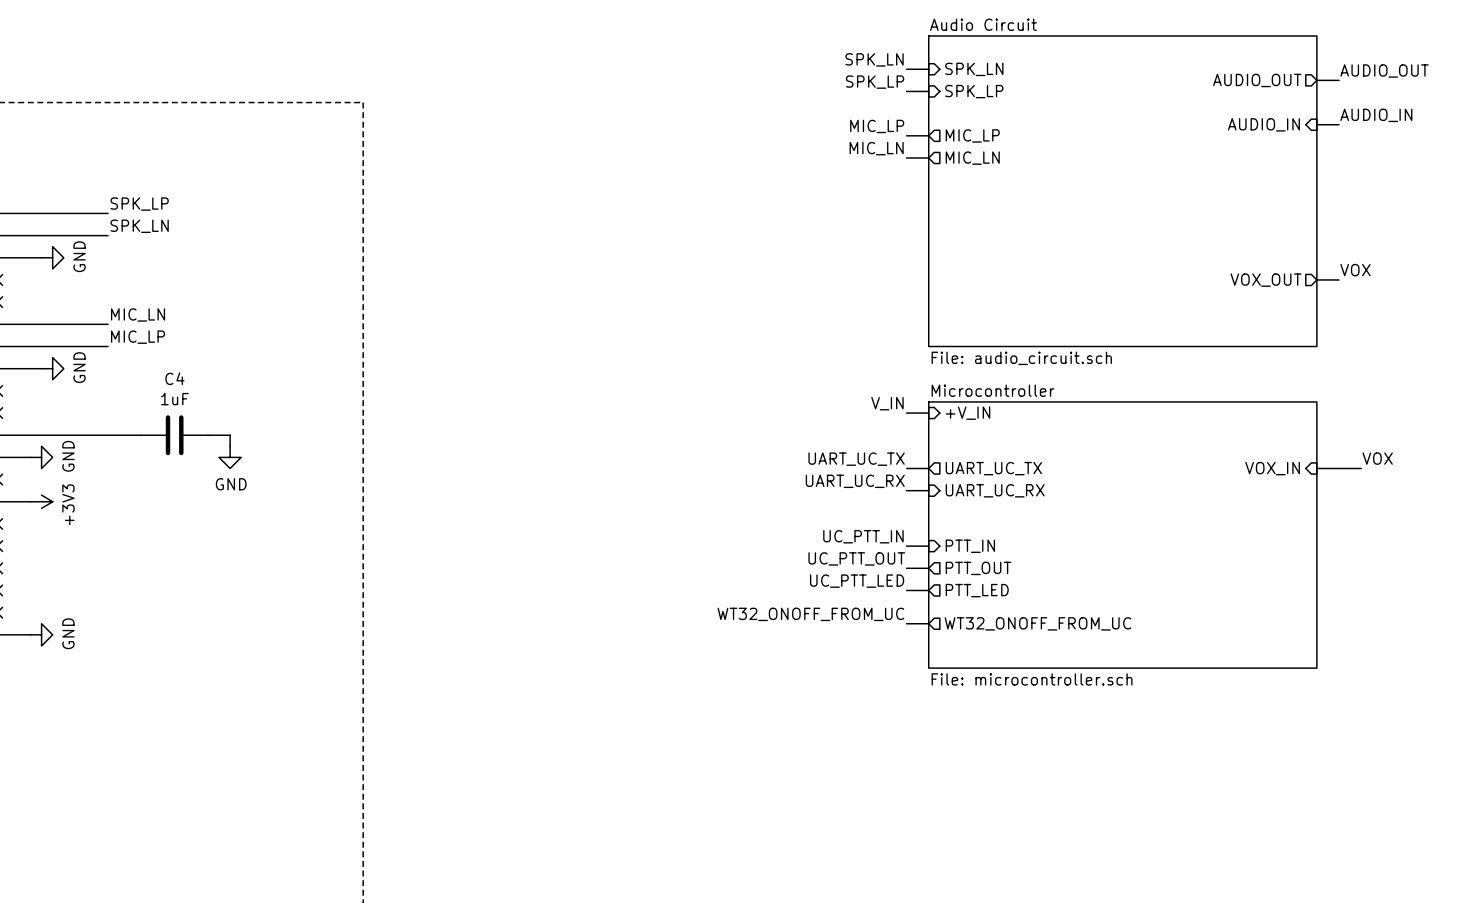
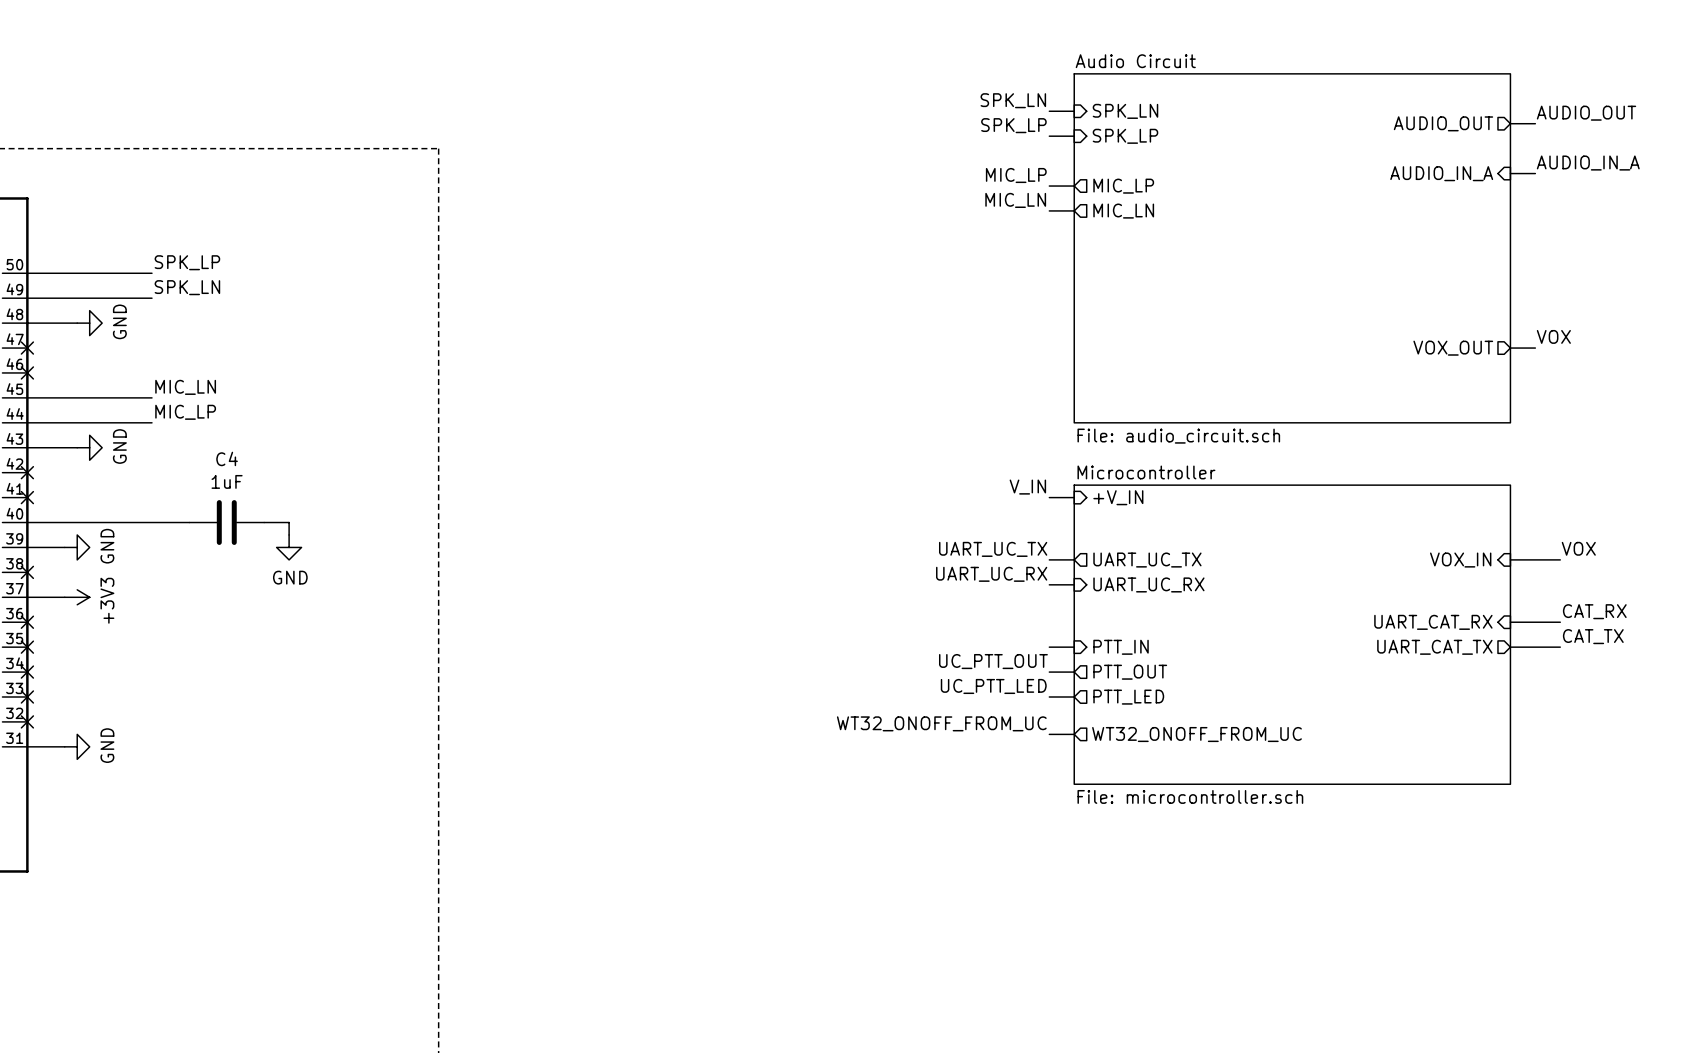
label: AUDIO_IN (1376, 115) -> AUDIO_IN_A (1588, 163)
sheet pin: AUDIO_IN (1263, 124) -> AUDIO_IN_A (1441, 173)
label: none -> CAT_RX (1594, 611)
wire: none -> (1510, 622) (1560, 622)
sheet pin: none -> UART_CAT_RX (1433, 622)
label: UC_PTT_IN (863, 536) -> none
label: none -> CAT_TX (1593, 636)
sheet pin: none -> UART_CAT_TX (1434, 647)
wire: none -> (1510, 647) (1560, 647)

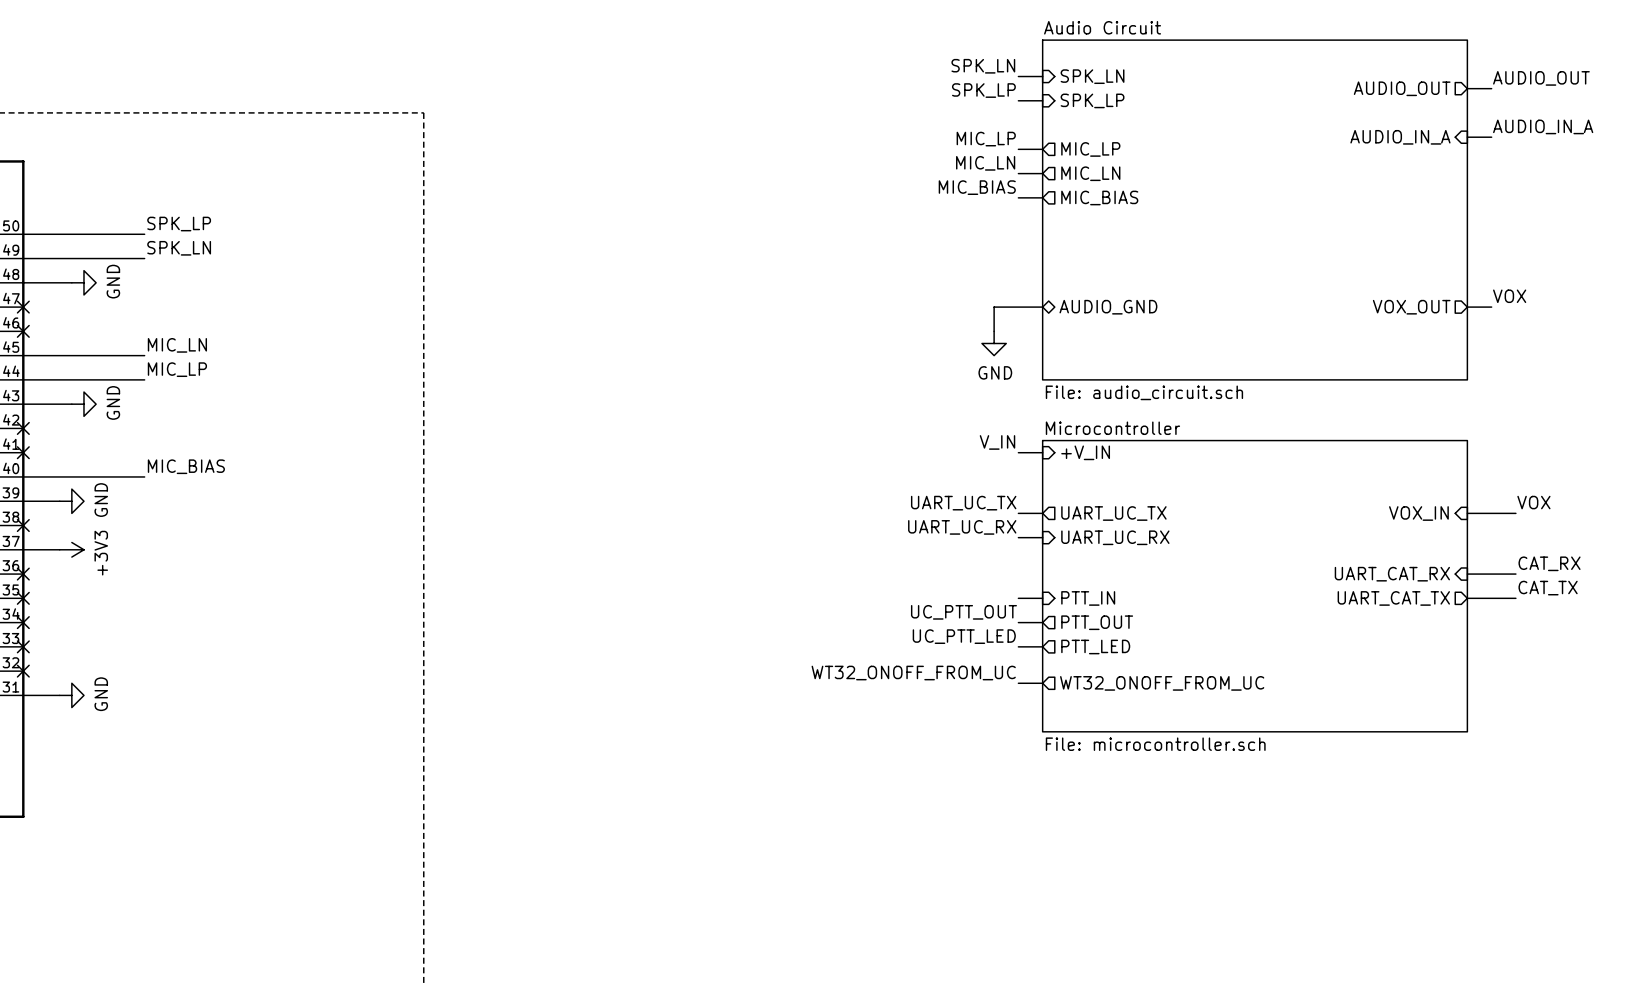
label: none -> MIC_BIAS (977, 187)
wire: none -> (1018, 197) (1042, 197)
sheet pin: none -> MIC_BIAS (1099, 197)
wire: none -> (1042, 307) (994, 307) (994, 331)
sheet pin: none -> AUDIO_GND (1108, 307)
power symbol: none -> GND (994, 343)
label: none -> MIC_BIAS (186, 466)
wire: (152, 522) (189, 522) -> none
C4: 1uF (226, 522) -> none
wire: (264, 522) (289, 522) (289, 534) -> none
power symbol: GND (289, 547) -> none

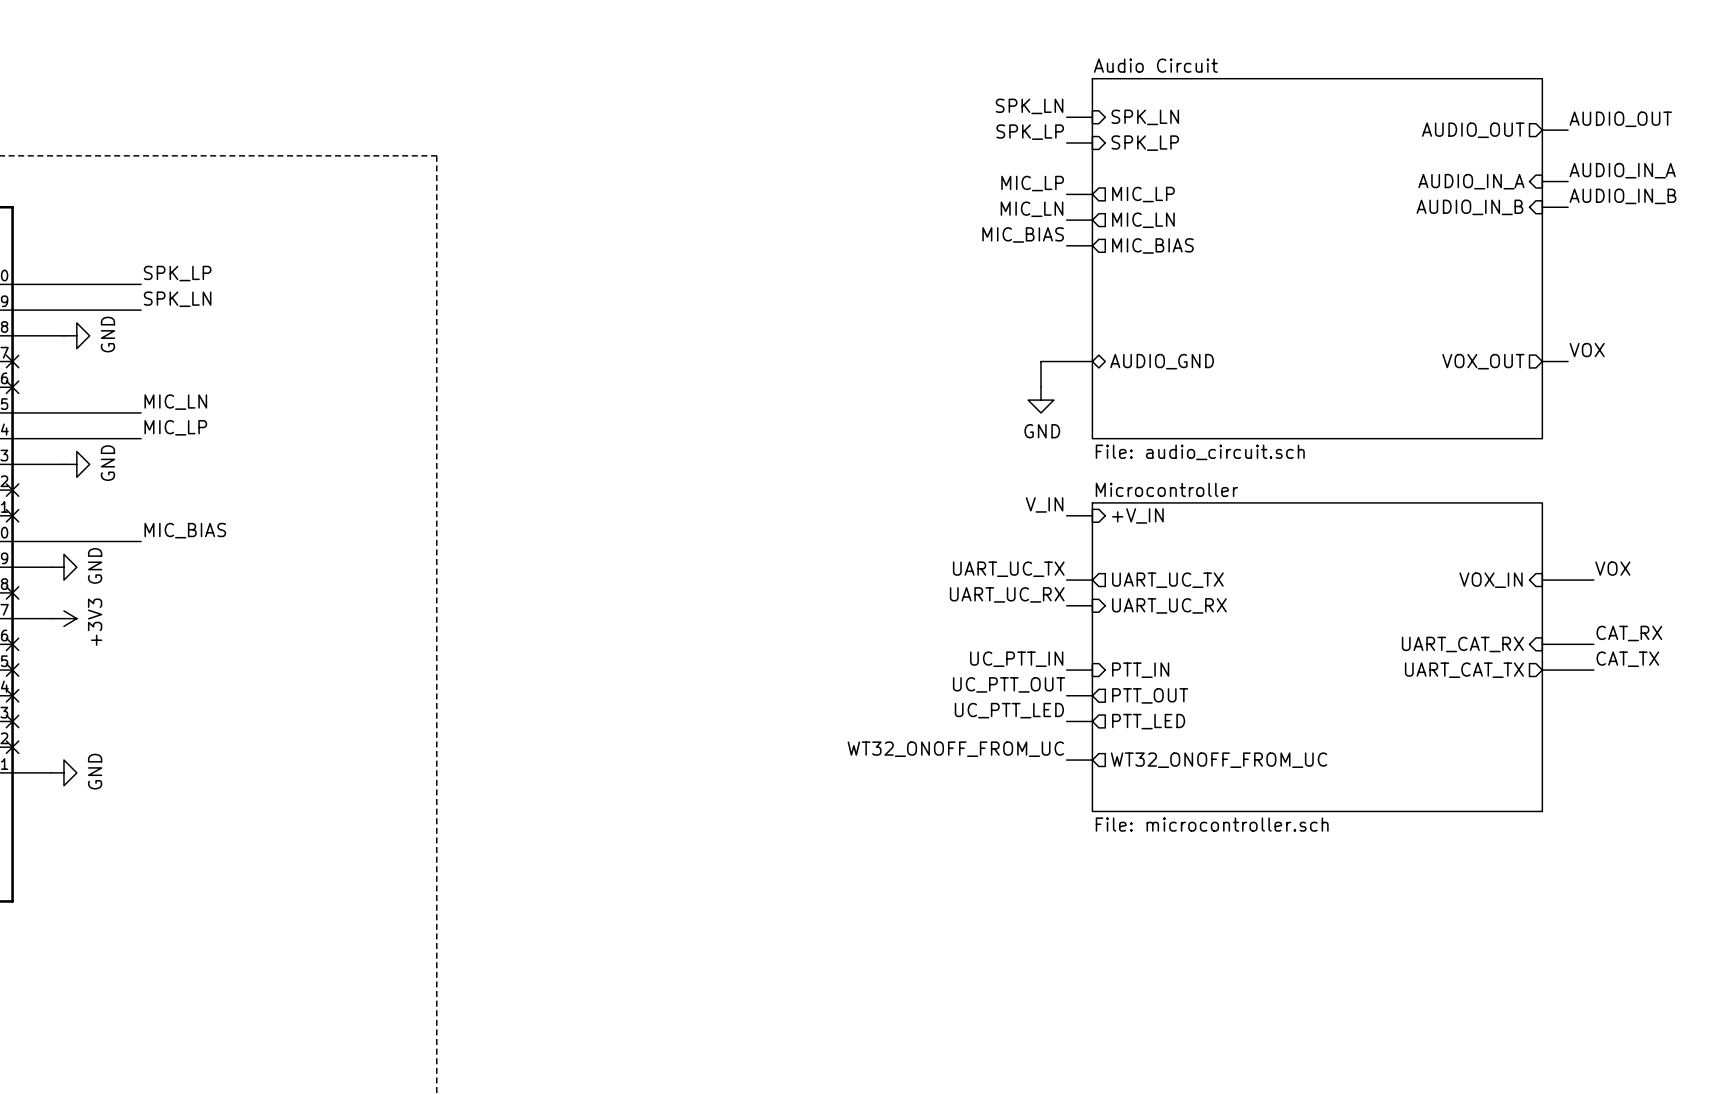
label: none -> AUDIO_IN_B (1622, 196)
sheet pin: none -> AUDIO_IN_B (1469, 207)
wire: none -> (1542, 207) (1568, 207)
label: none -> UC_PTT_IN (1016, 659)

